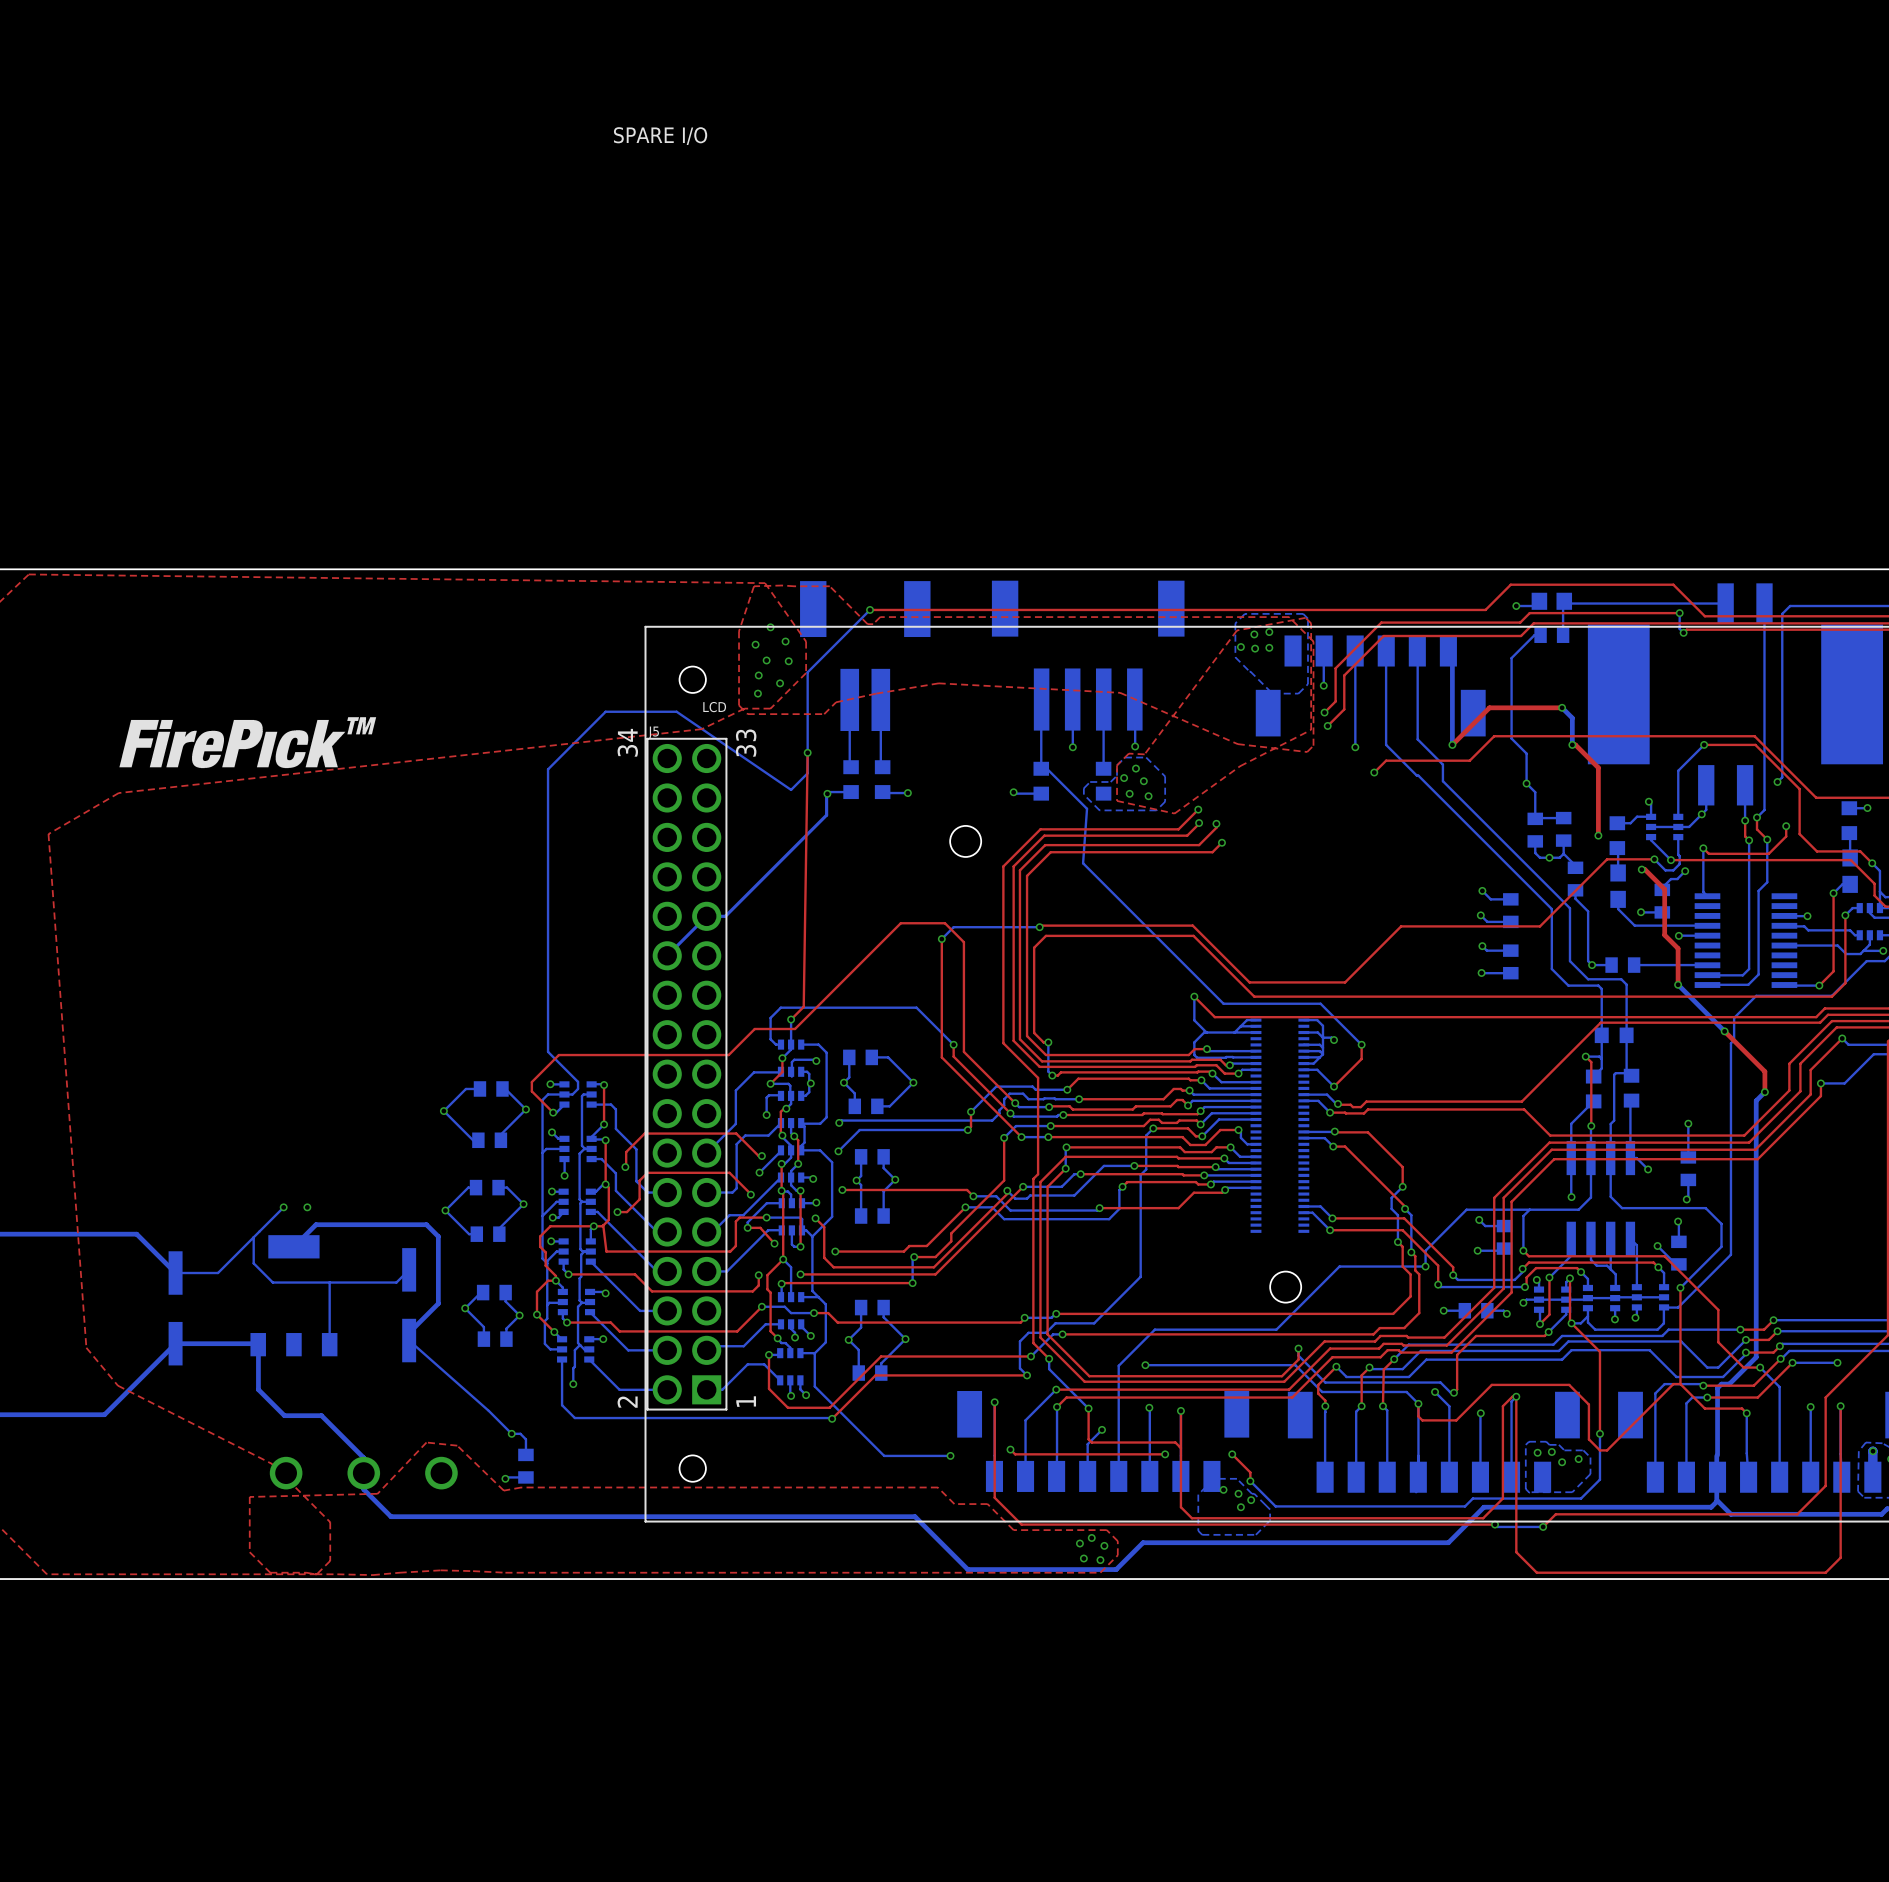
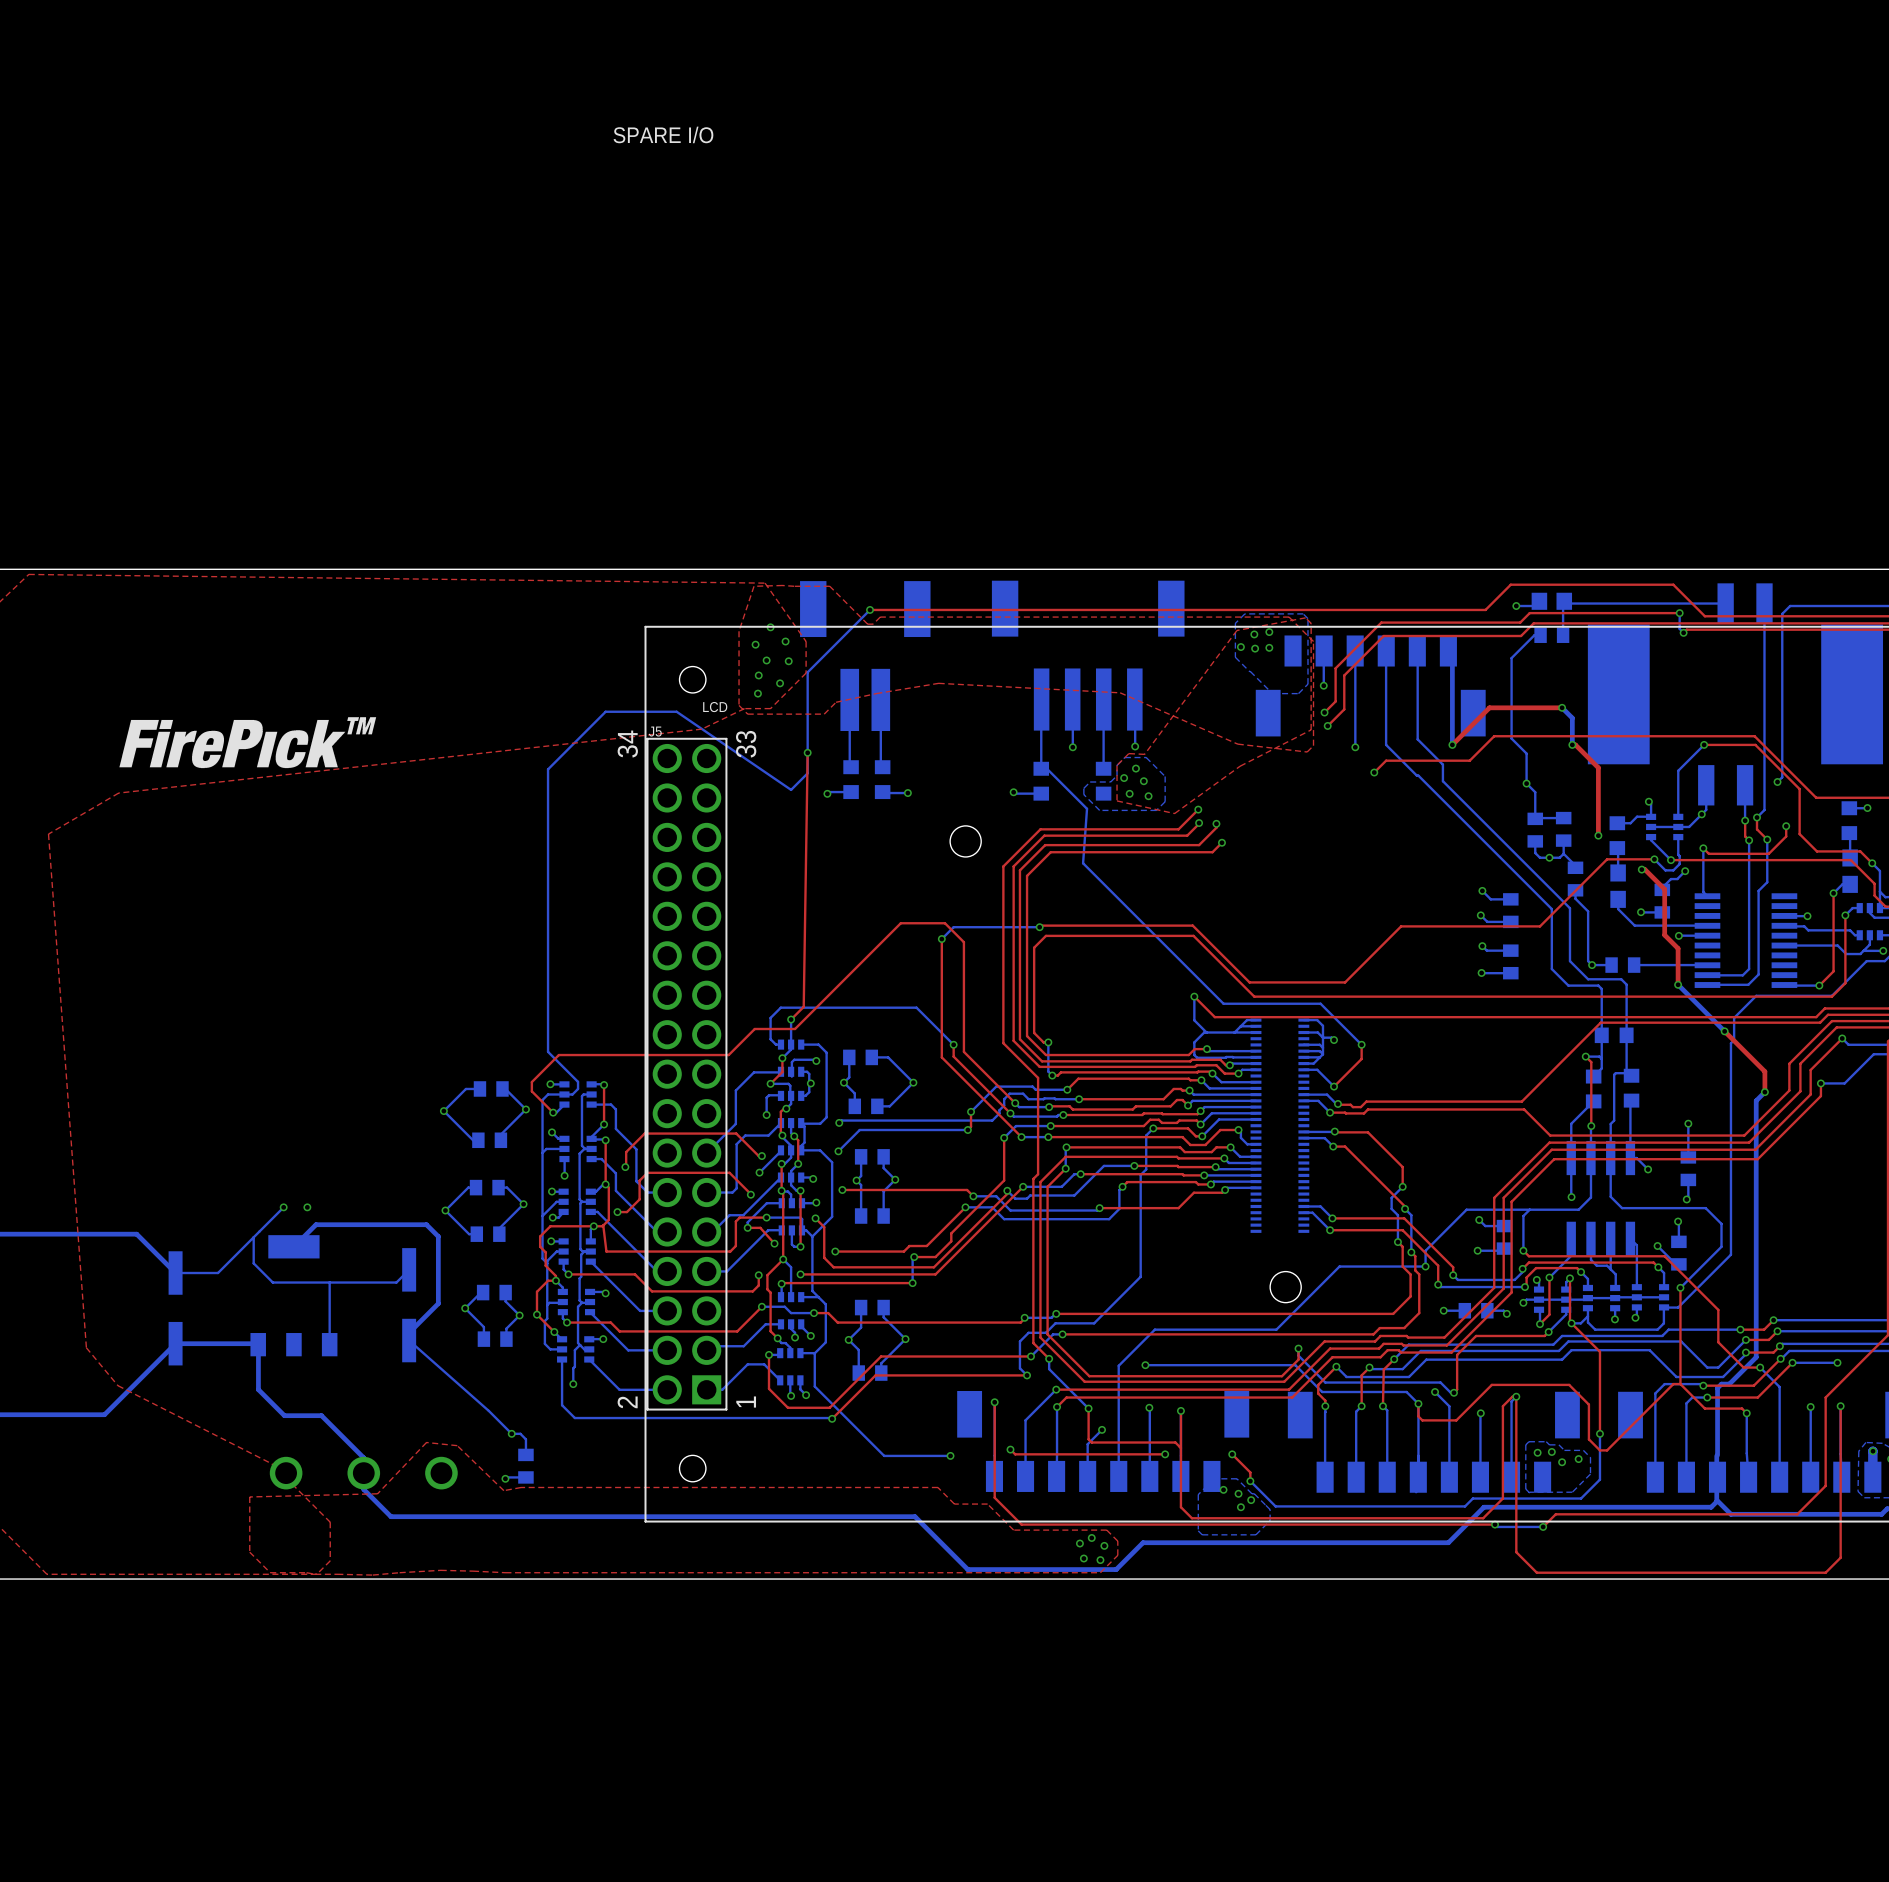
bottom track: (827, 793) (826, 815) (725, 916) (706, 916) (667, 955) -> none

